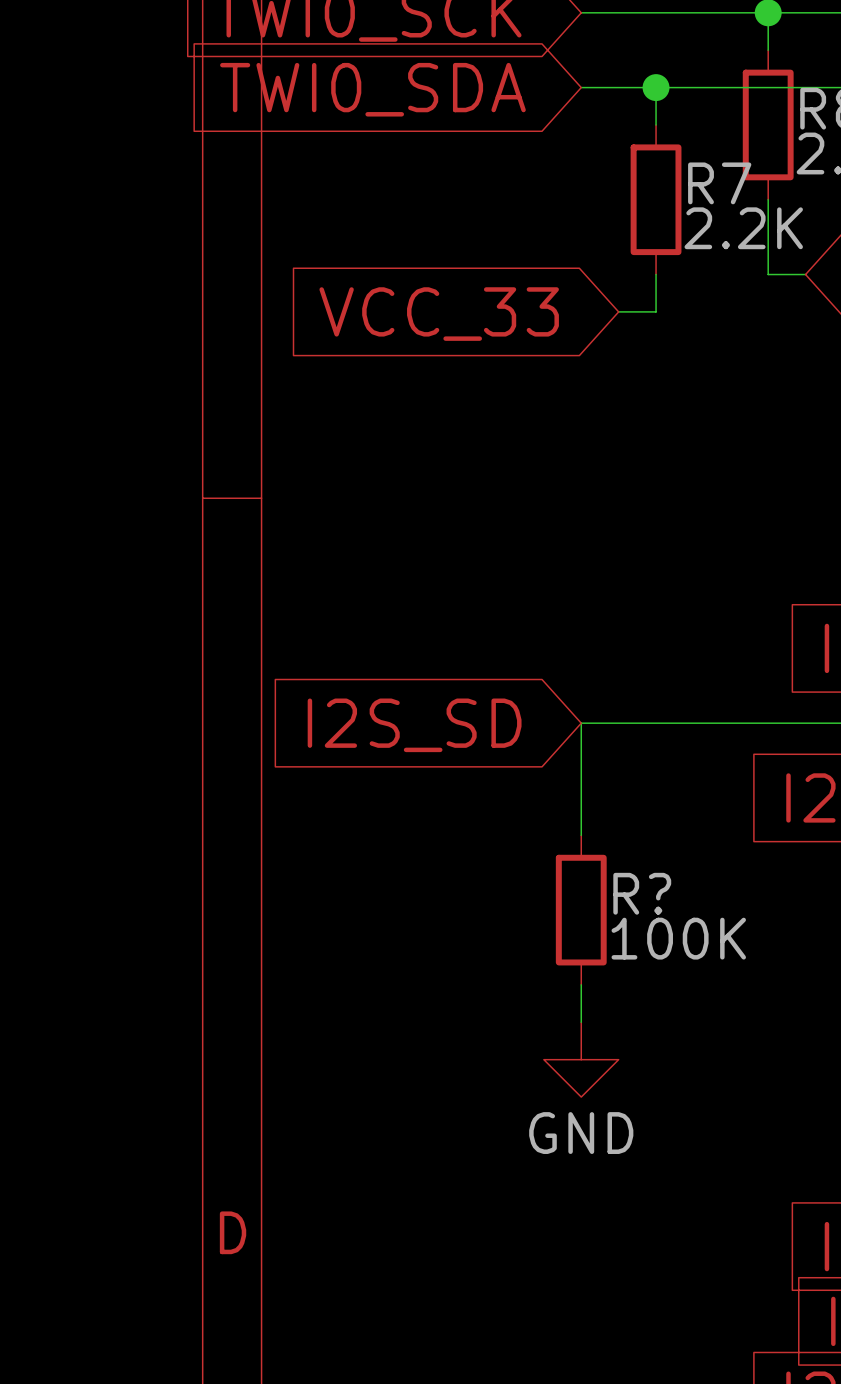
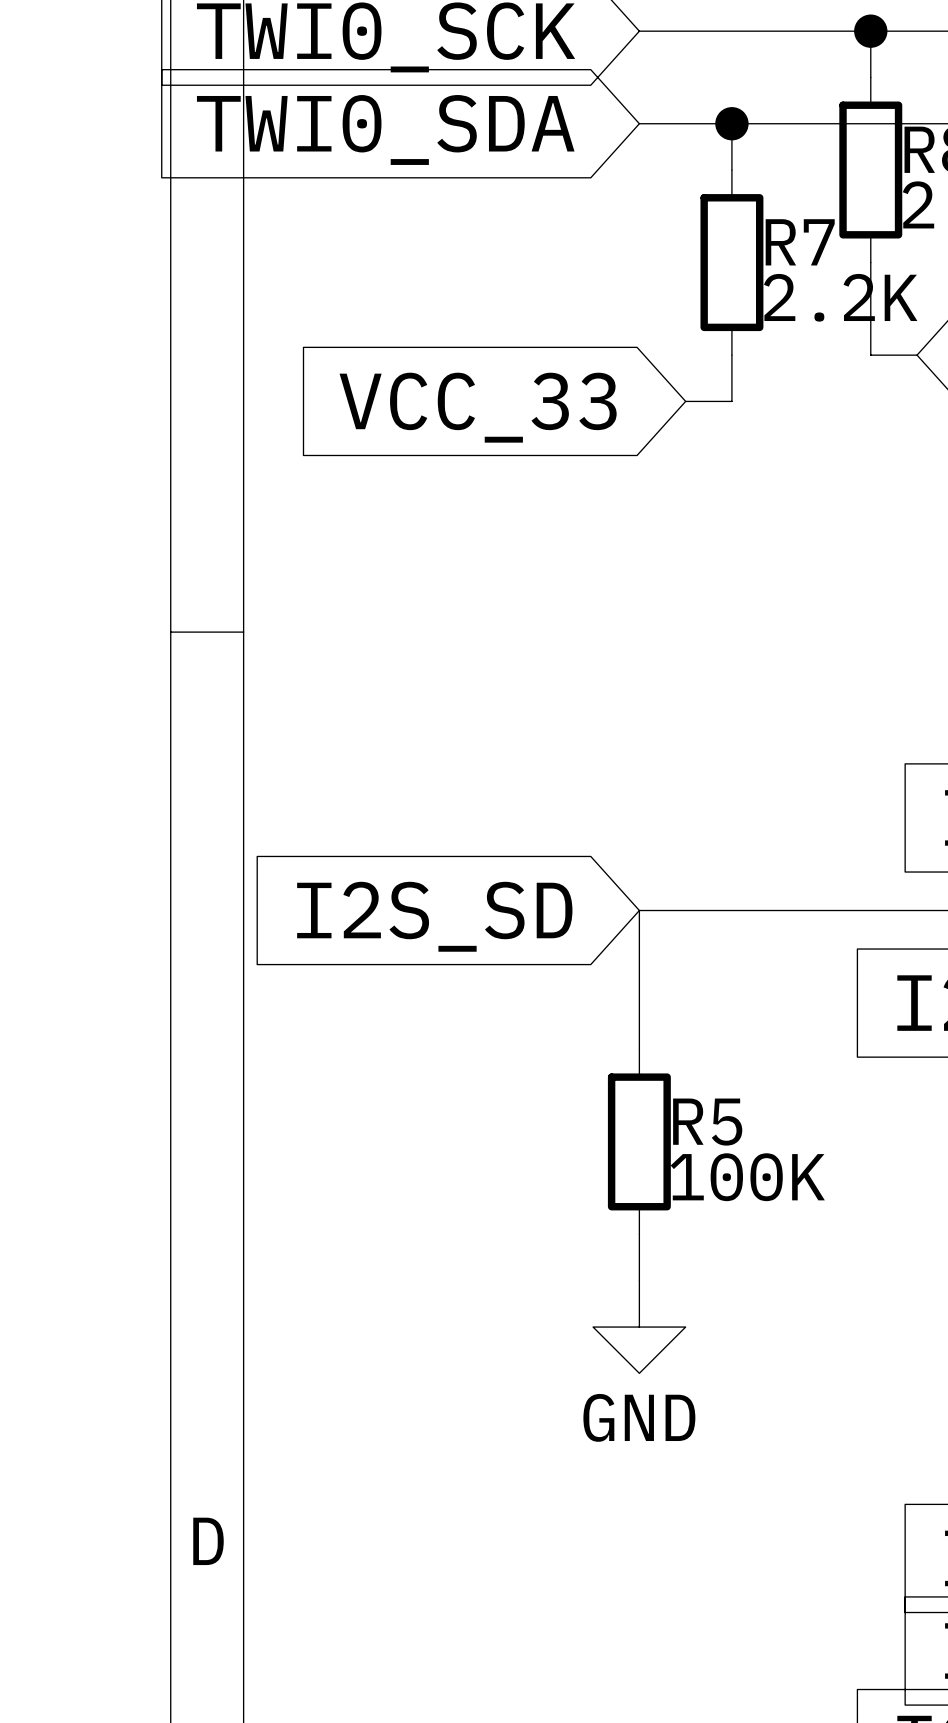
R? name: R? (642, 893) -> R5 (707, 1122)

